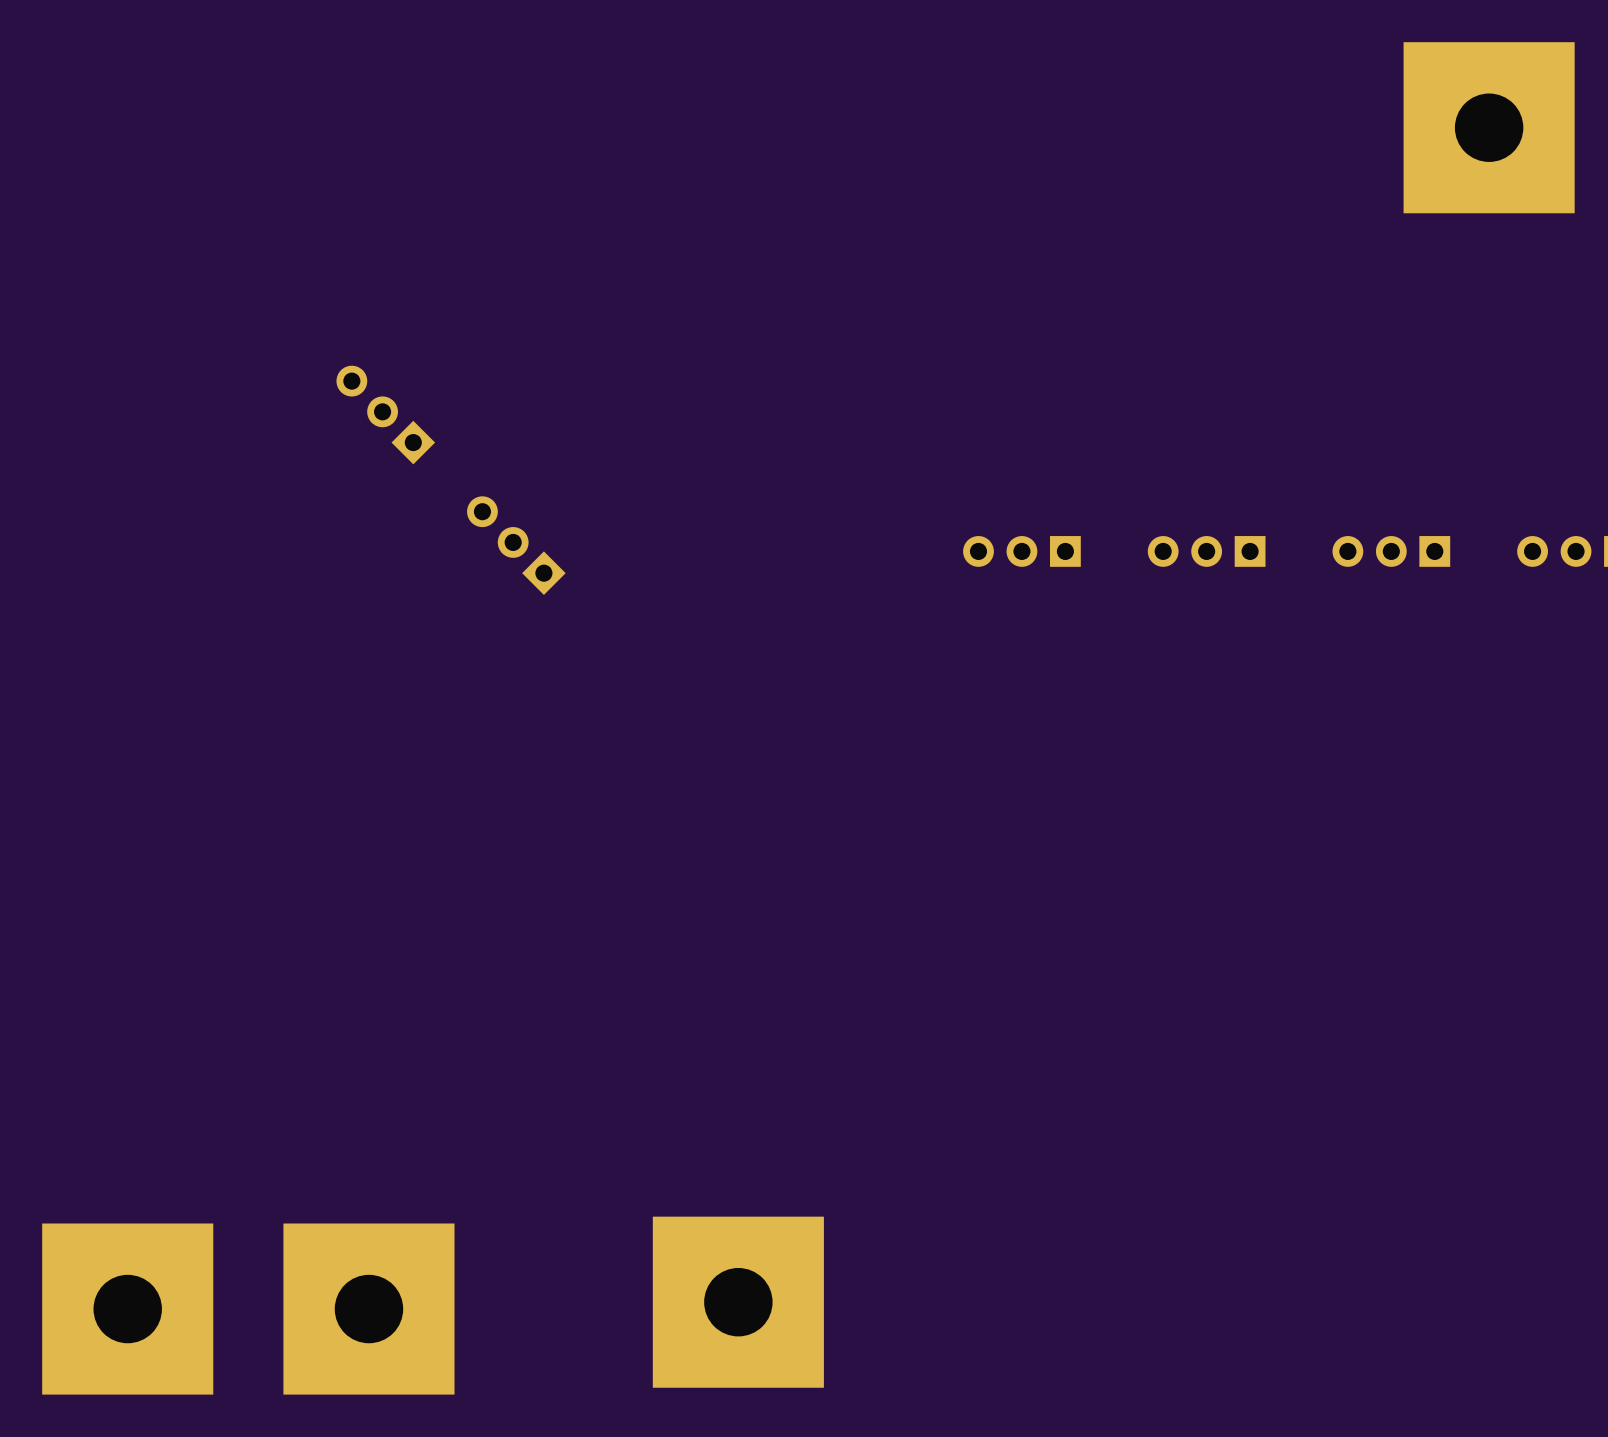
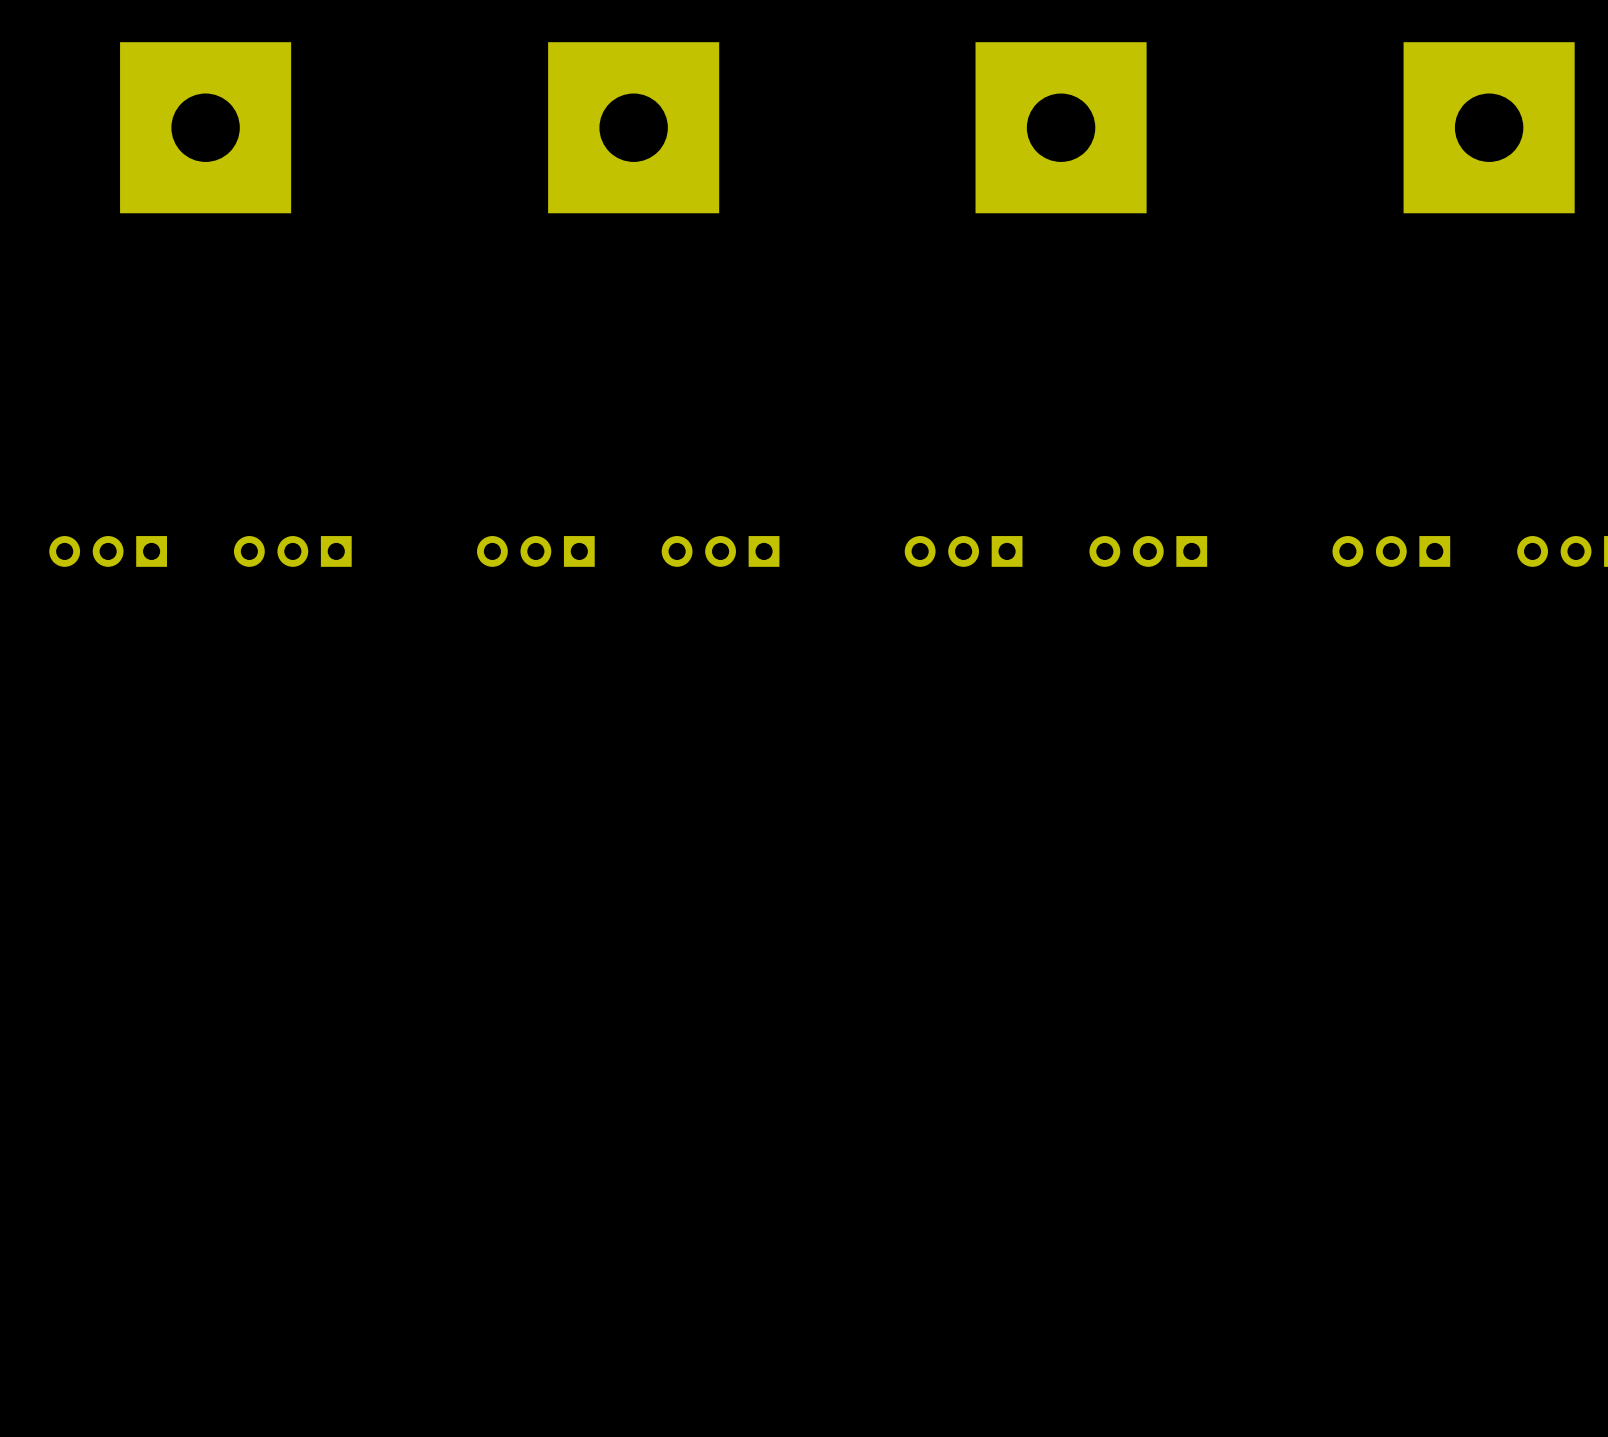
part: none -> (205, 127)
part: none -> (633, 127)
part: none -> (1061, 127)
part: (385, 415) -> none
part: (516, 545) -> none
part: none -> (108, 551)
part: none -> (292, 551)
part: none -> (535, 551)
part: none -> (720, 551)
part position: (1021, 551) -> (963, 551)
part position: (1206, 551) -> (1148, 551)
part: (738, 1302) -> none
part: (127, 1309) -> none
part: (368, 1309) -> none

